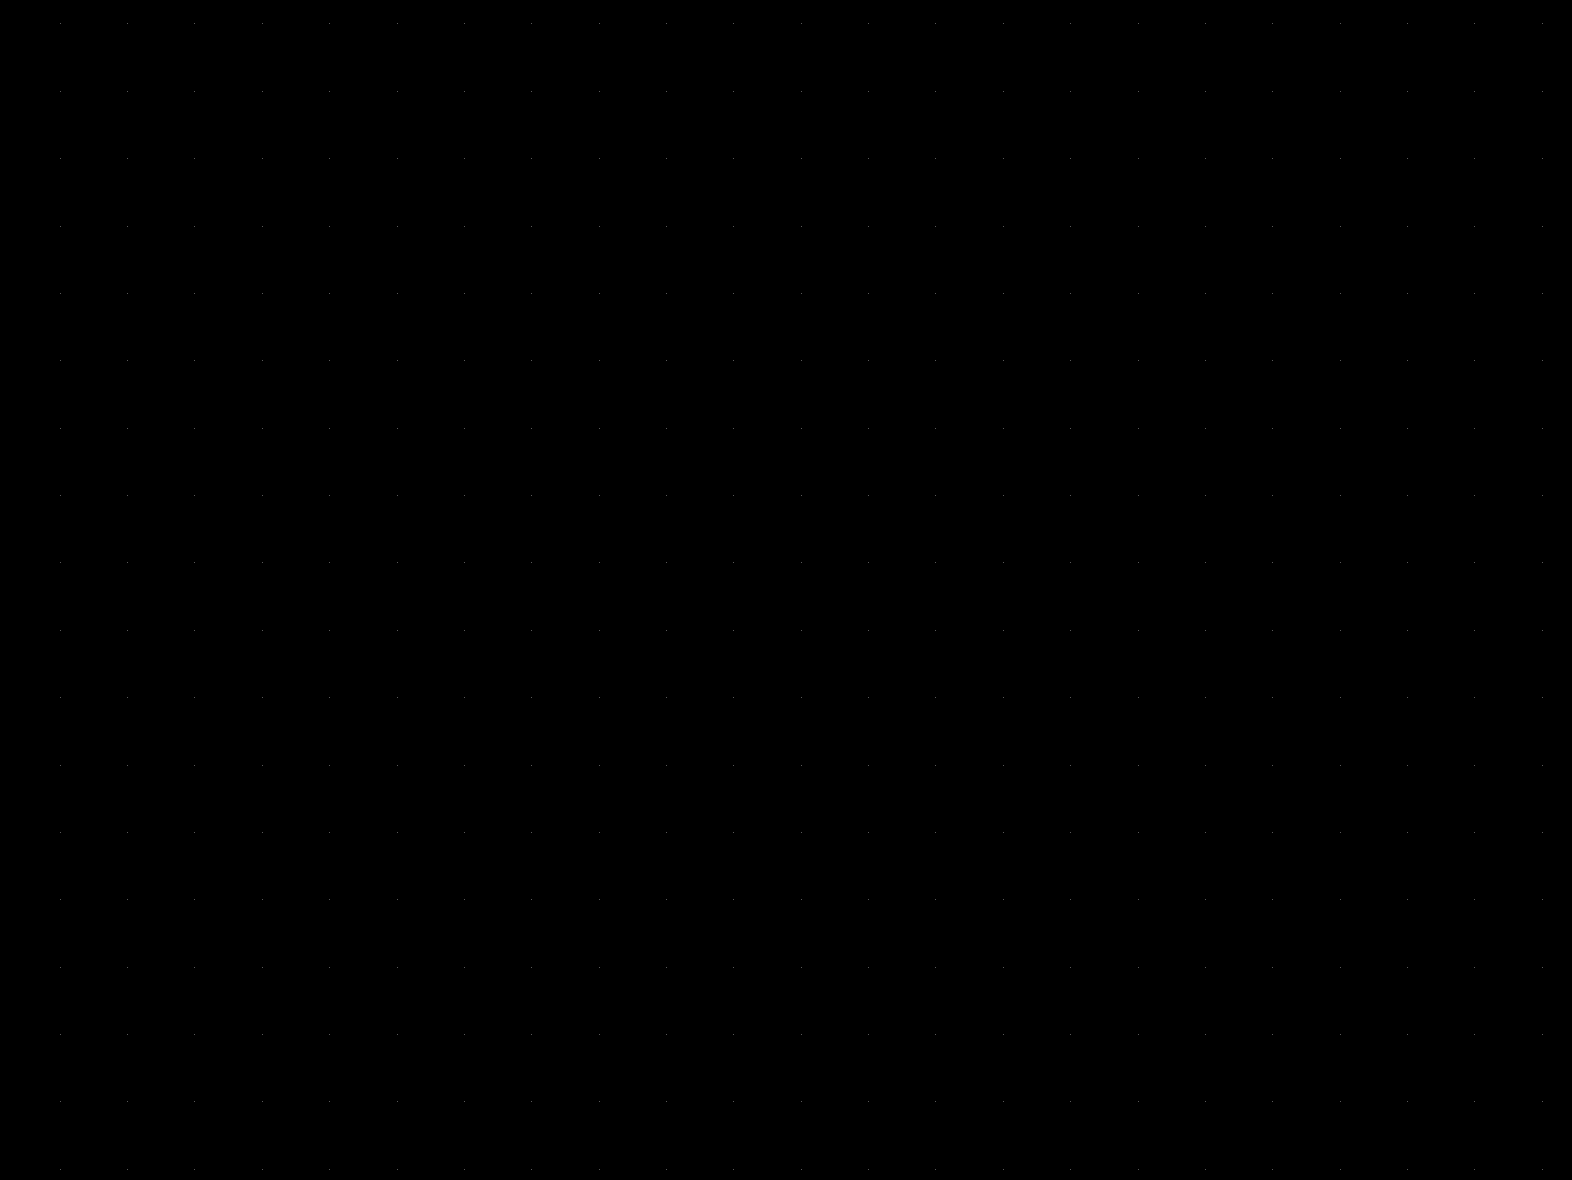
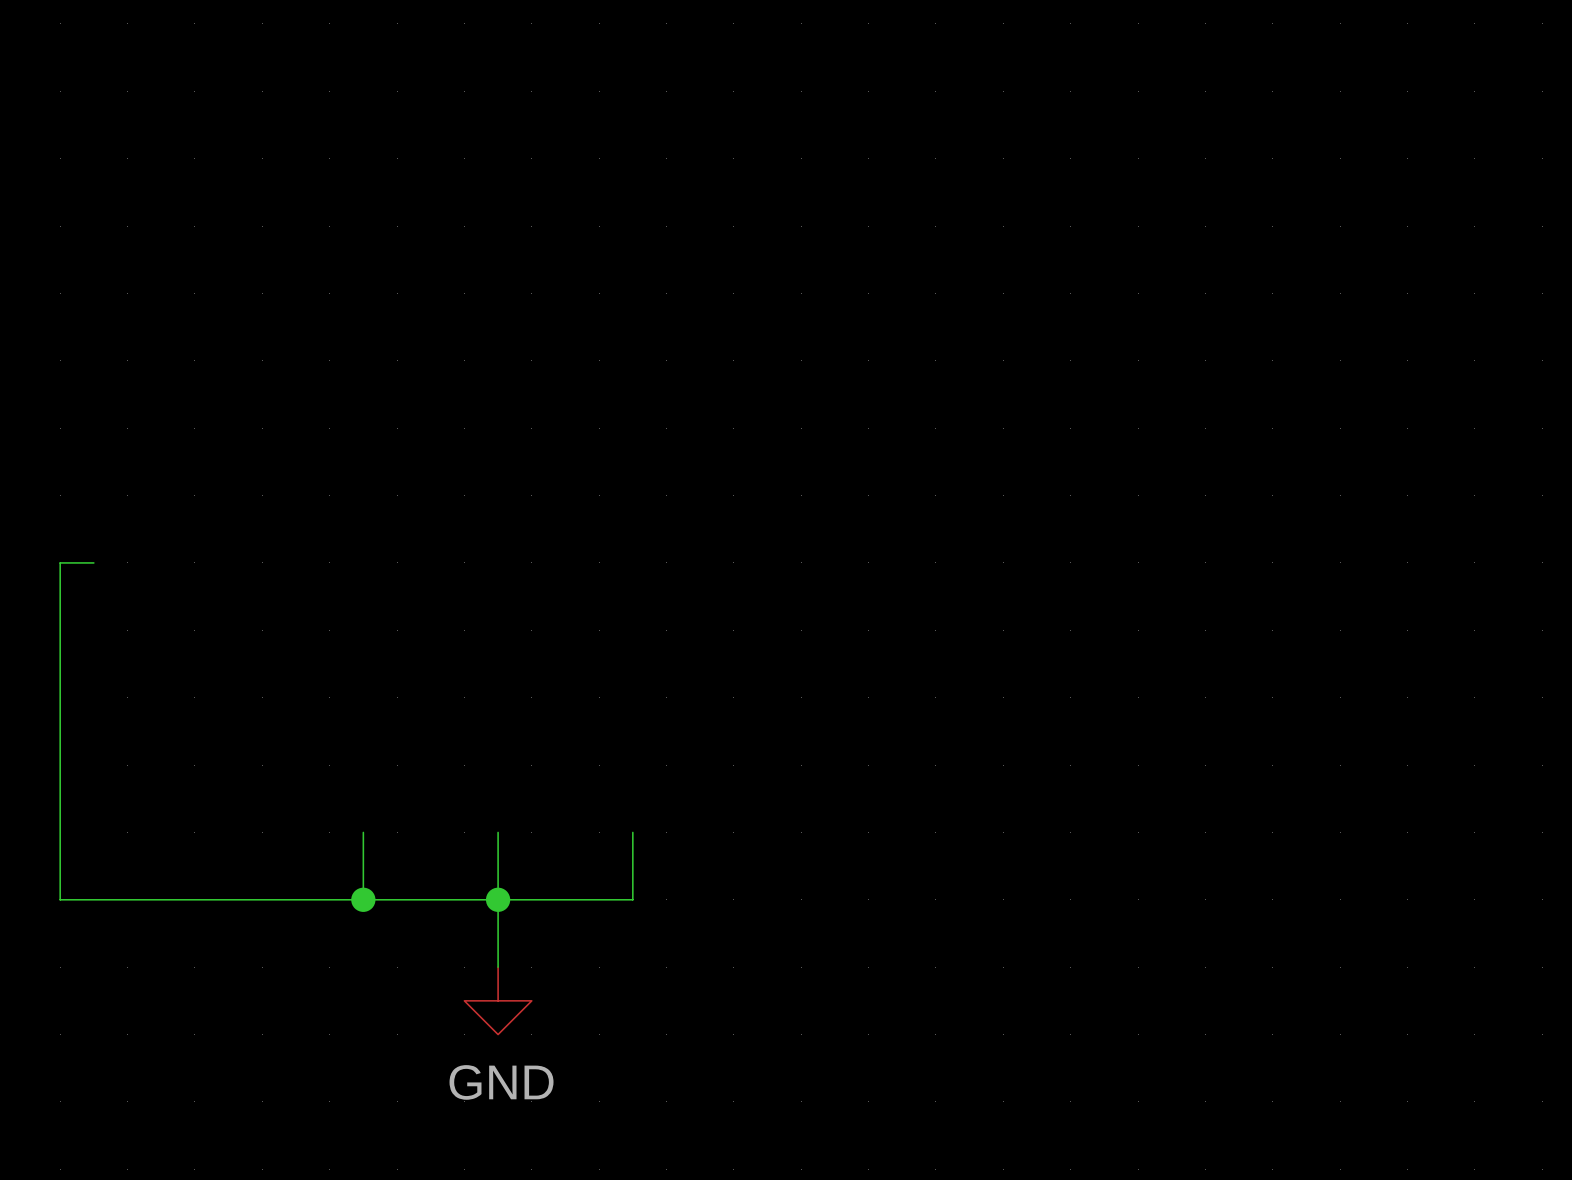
wire: none -> (93, 562) (60, 562) (60, 899) (632, 899) (632, 832)
wire: none -> (363, 832) (363, 899)
wire: none -> (498, 832) (498, 967)
junction: none -> (363, 899)
junction: none -> (498, 899)
power symbol: none -> GND (498, 1000)

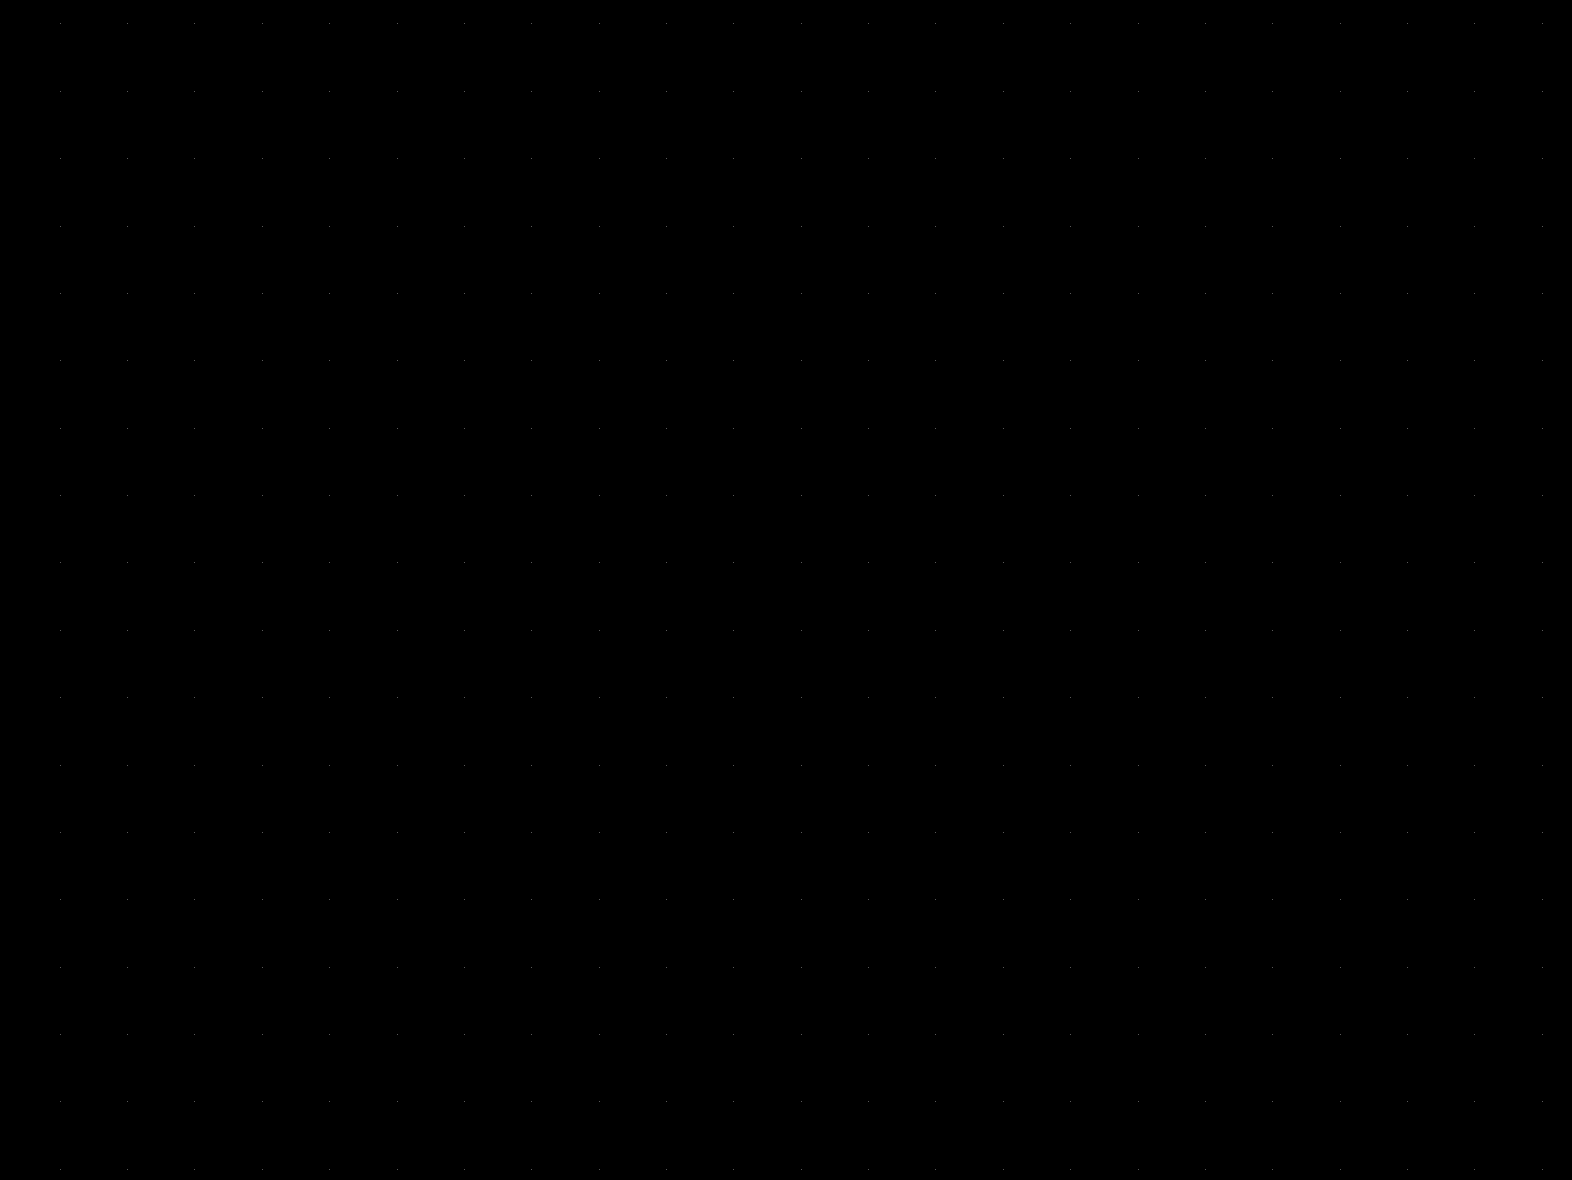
wire: (93, 562) (60, 562) (60, 899) (632, 899) (632, 832) -> none
wire: (363, 832) (363, 899) -> none
wire: (498, 832) (498, 967) -> none
junction: (363, 899) -> none
junction: (498, 899) -> none
power symbol: GND (498, 1000) -> none

